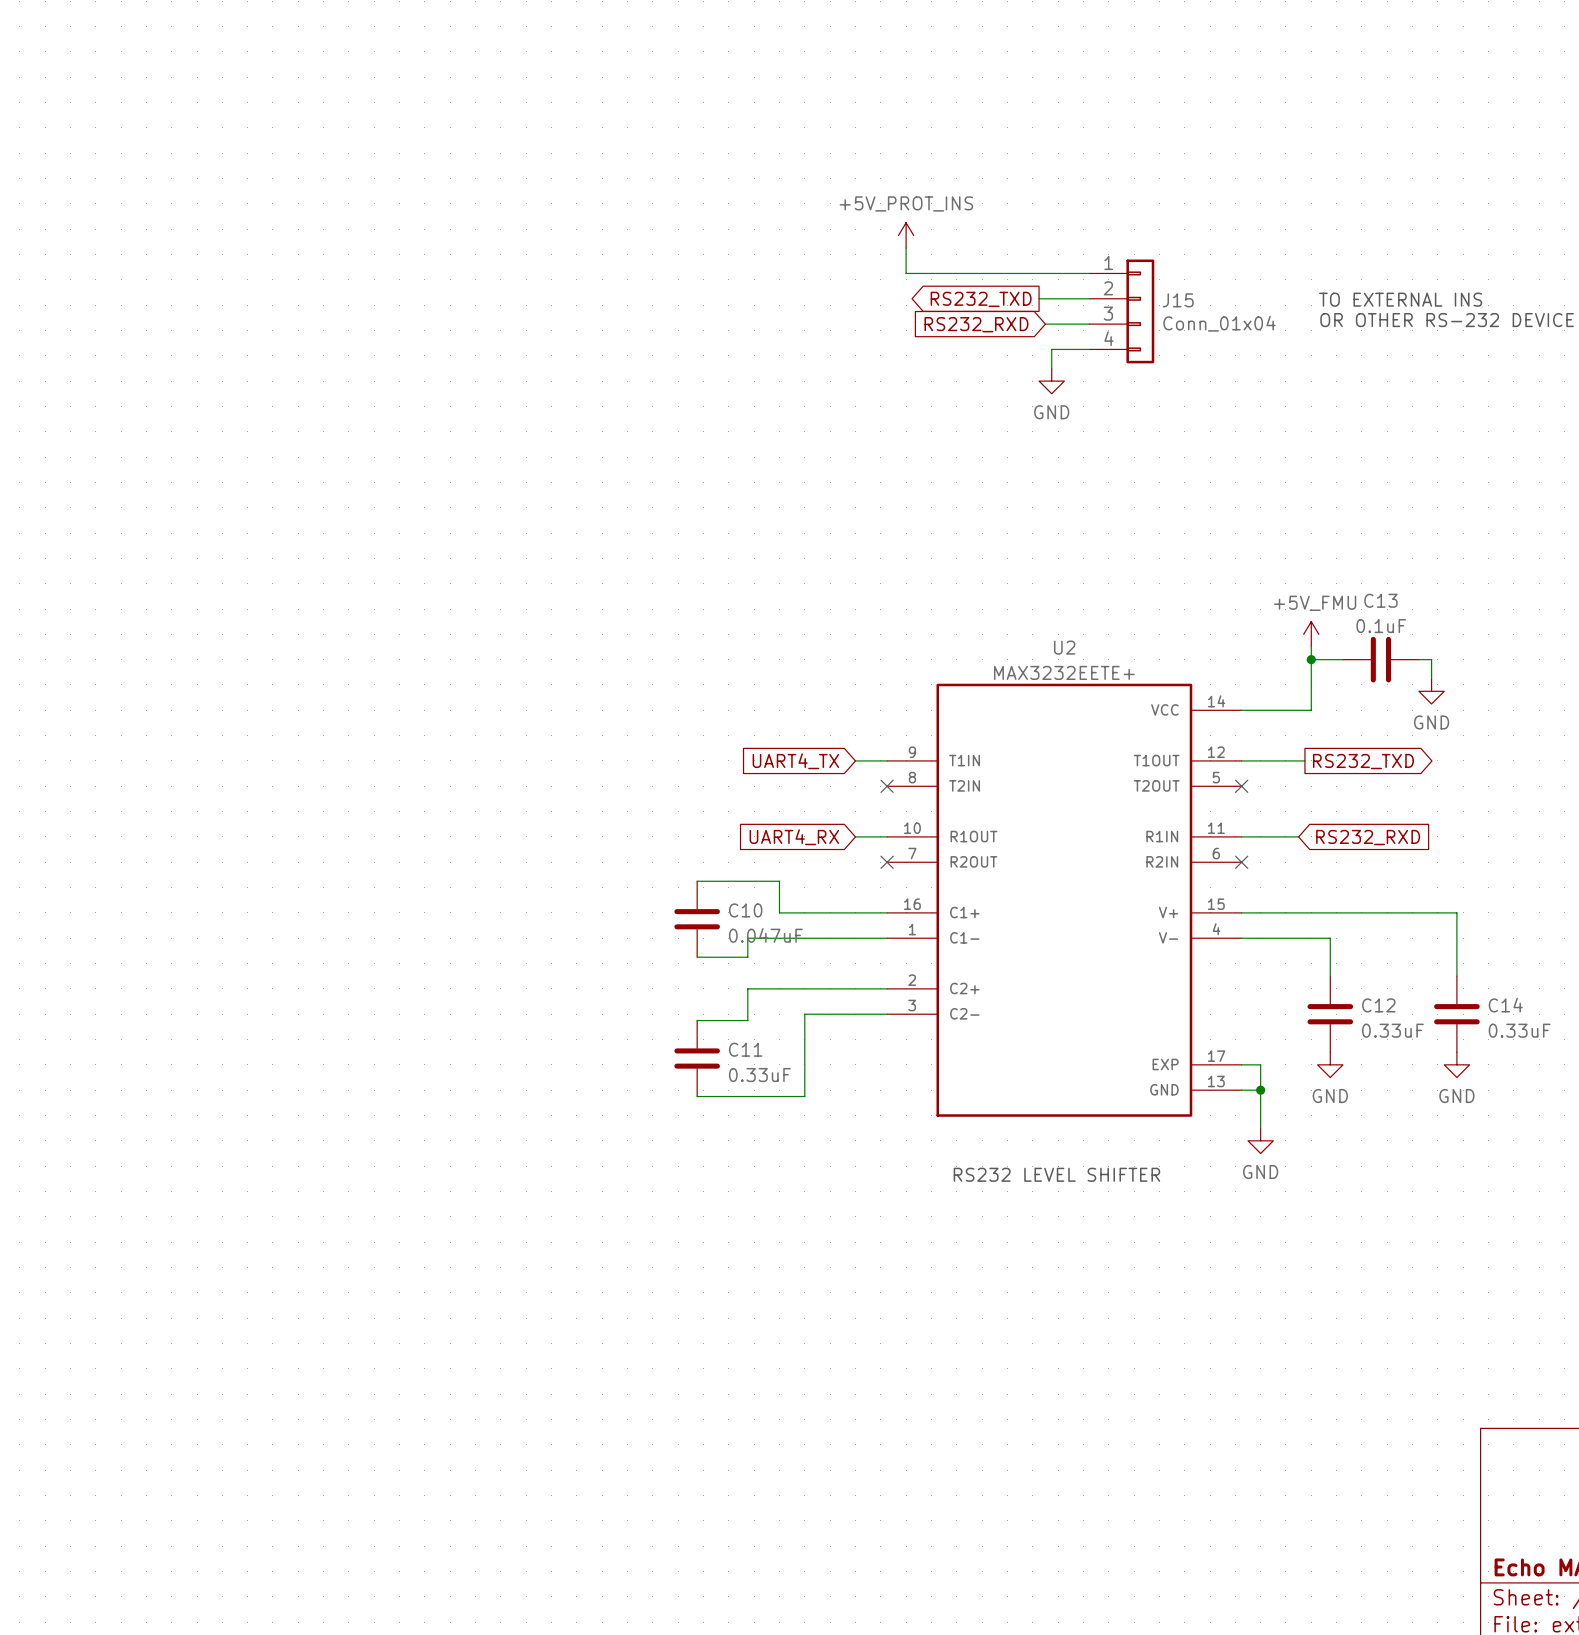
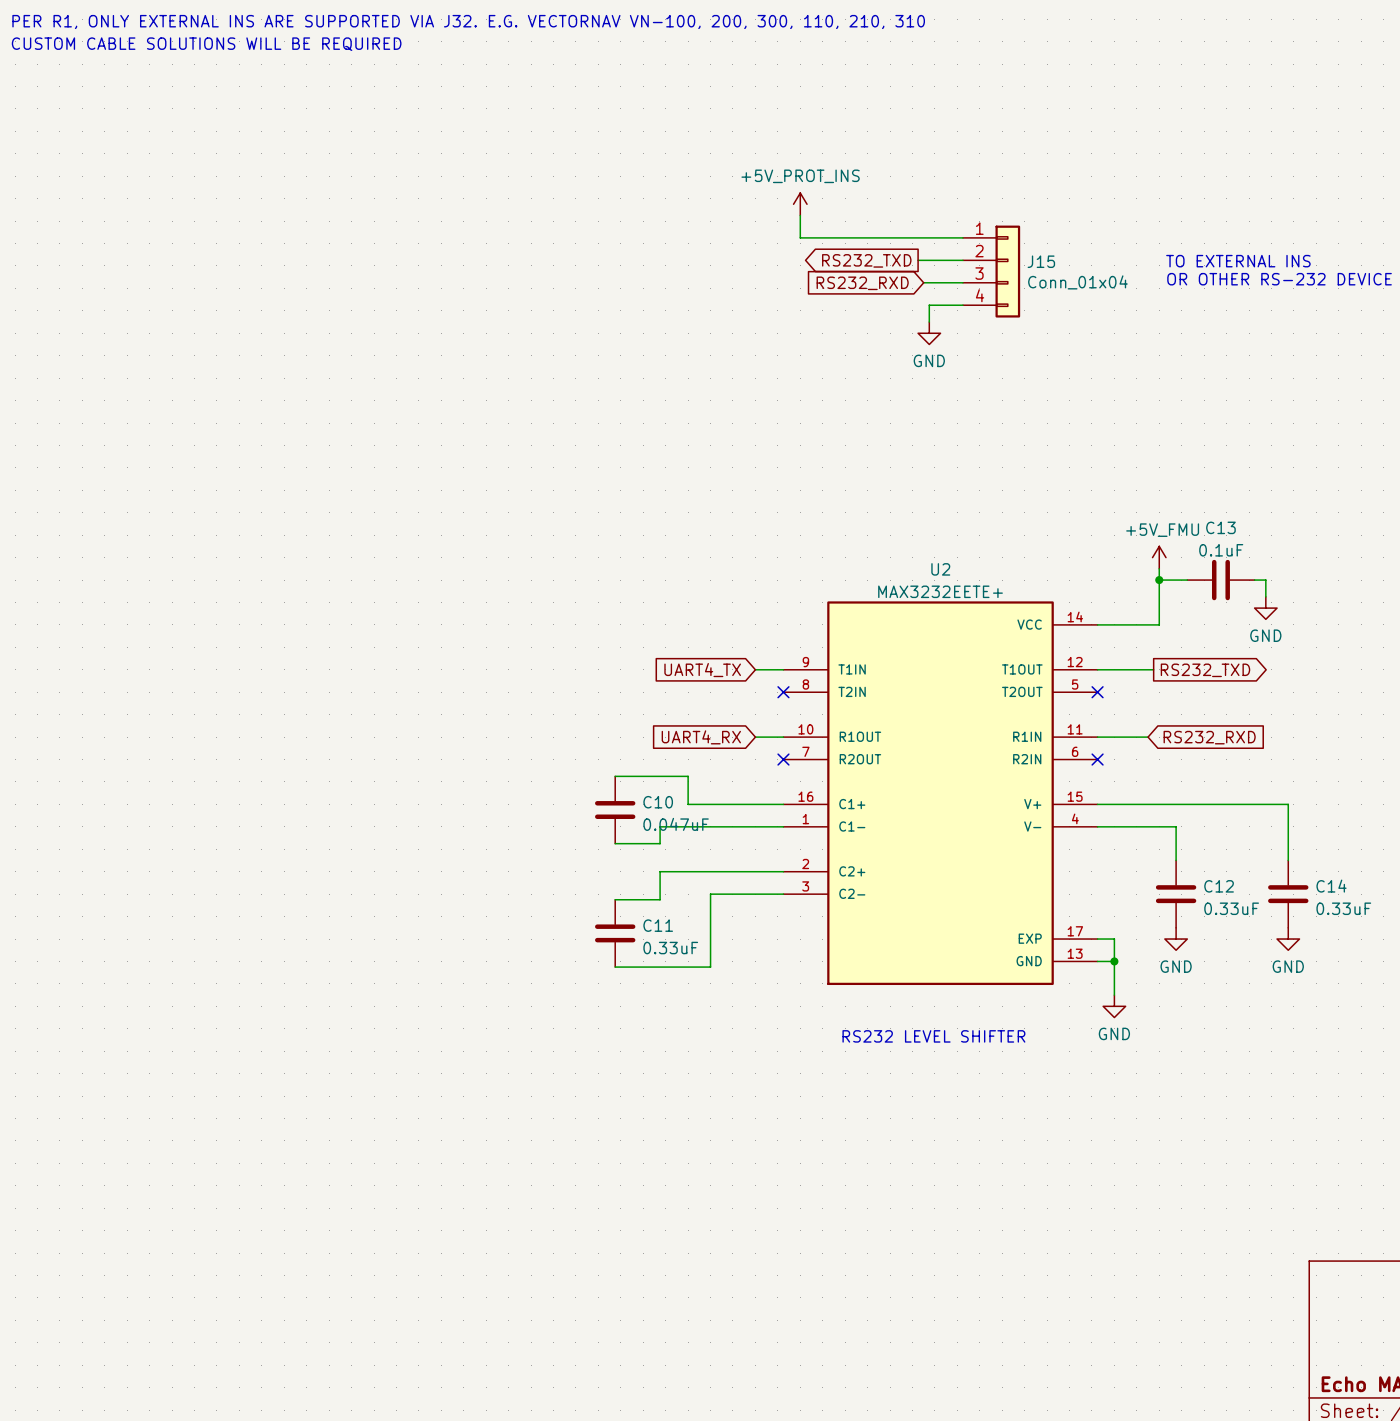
text: none -> PER R1, ONLY EXTERNAL INS ARE SUPPORTED VIA J32. E.G. VECTORNAV VN-100, 200, 300, 110, 210, 310 (468, 21)
text: none -> CUSTOM CABLE SOLUTIONS WILL BE REQUIRED (206, 44)

